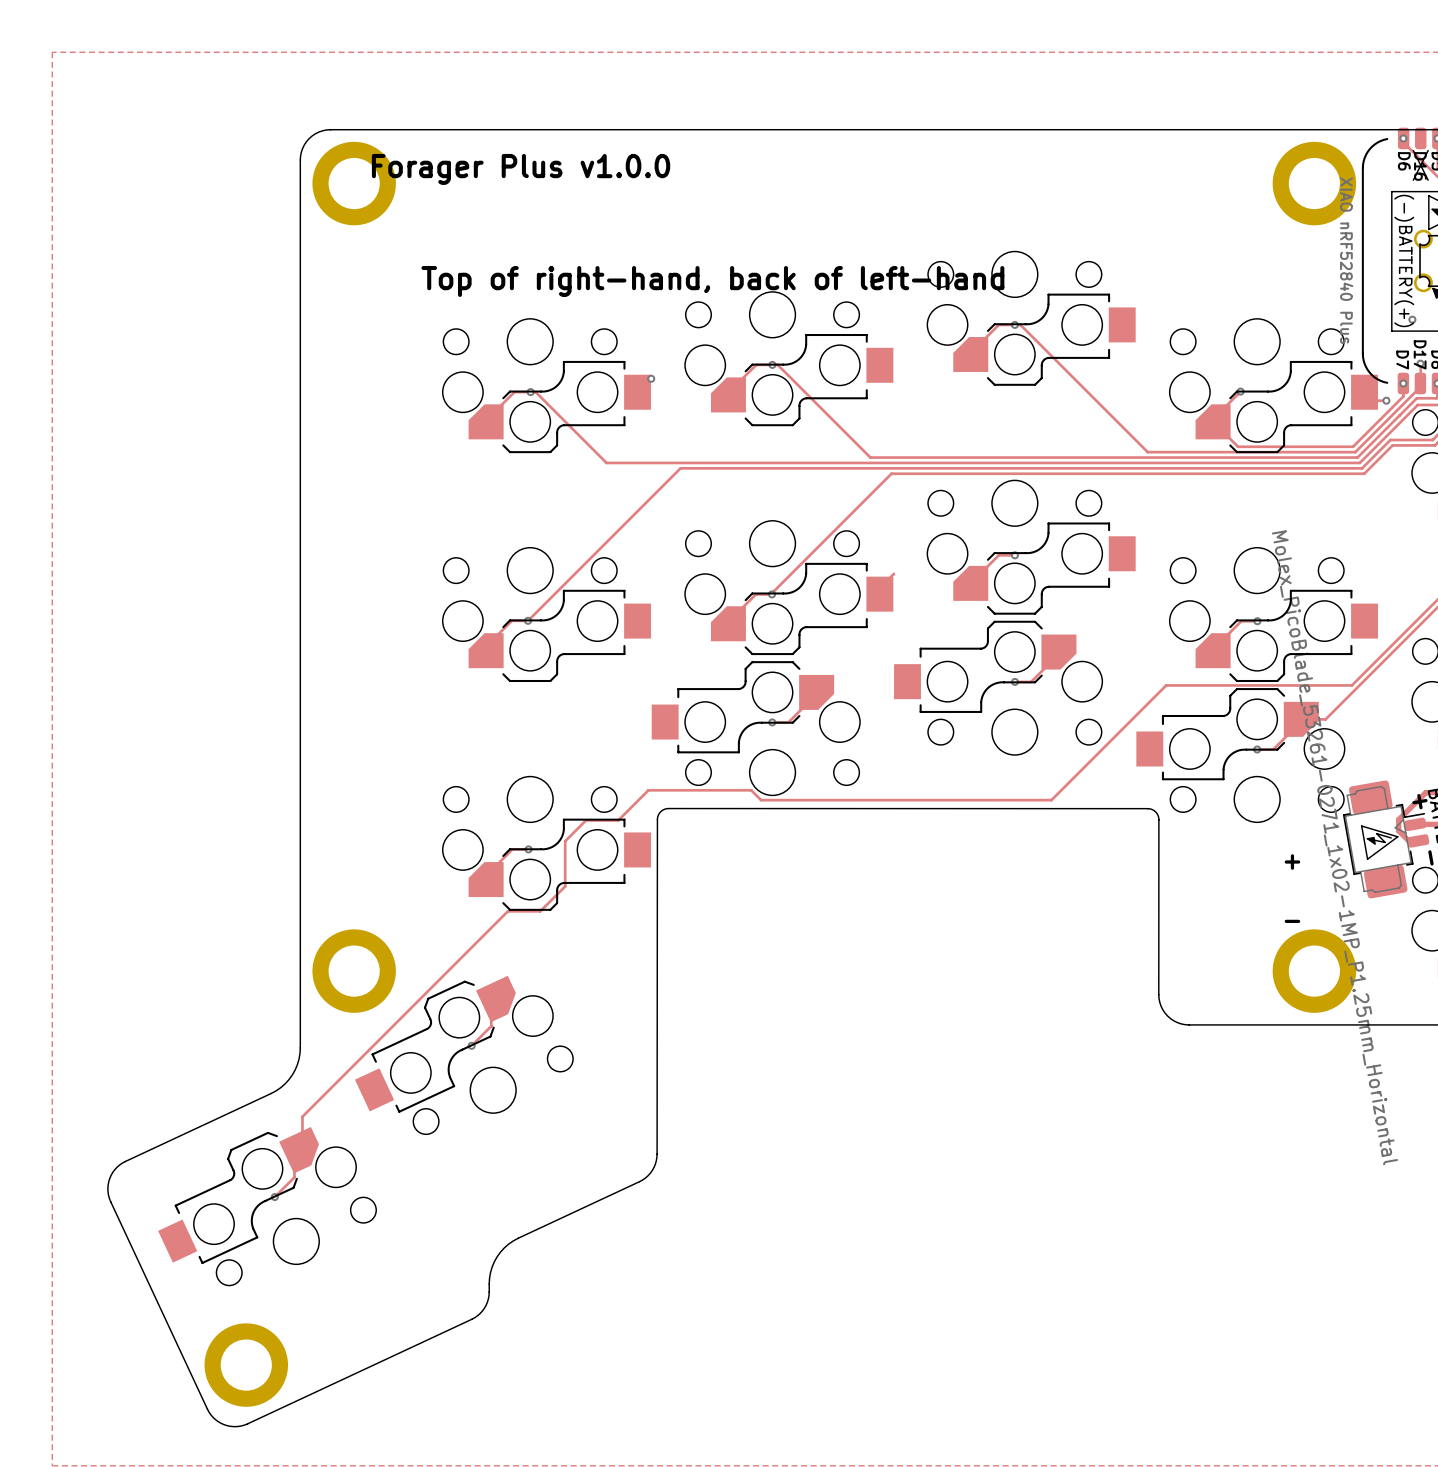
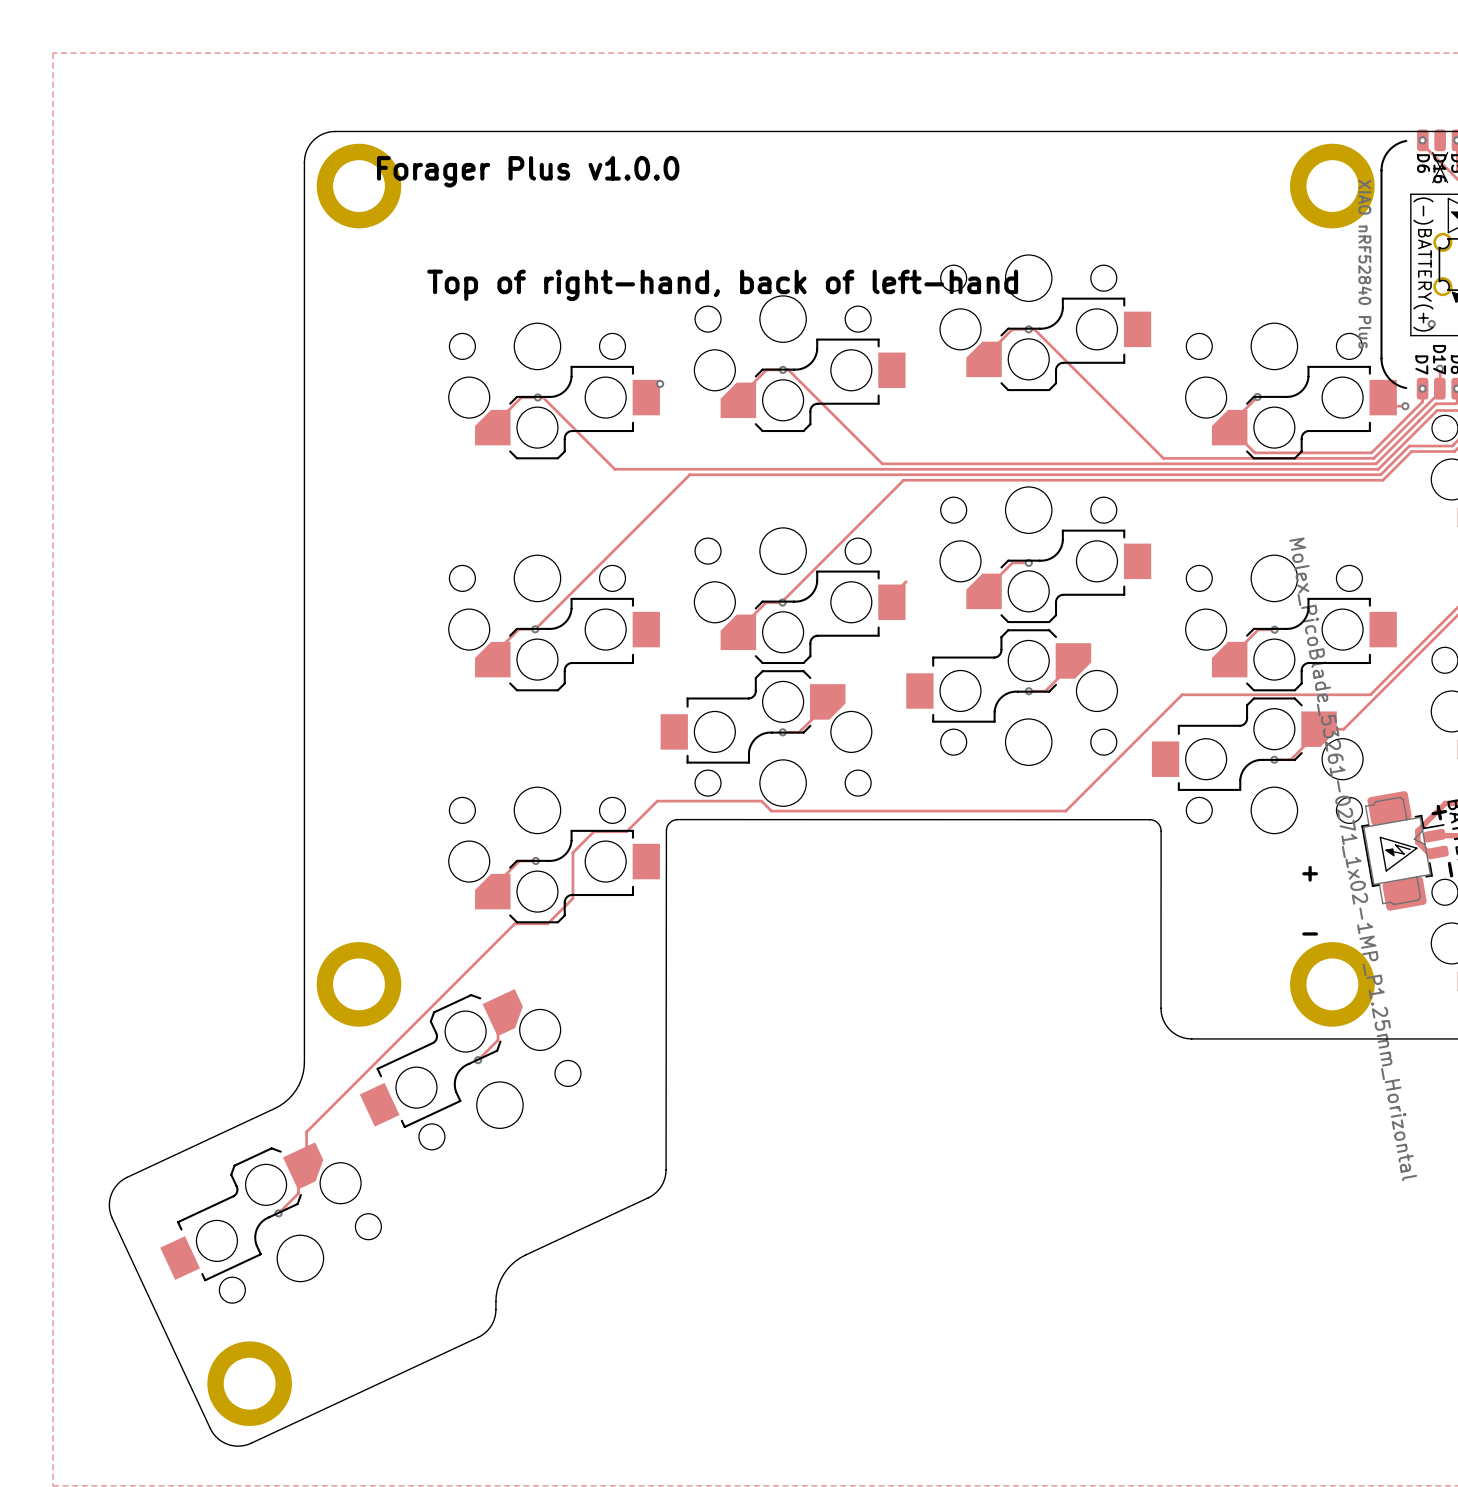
board edge: (1134, 808) (1152, 809) (1157, 814) (1158, 819) -> (1149, 819) (1157, 823) (1161, 830)
board edge: (1158, 819) (1159, 998) (1162, 1009) (1170, 1018) (1177, 1022) (1189, 1024) -> (1161, 831) (1162, 1016) (1167, 1026) (1176, 1034) (1187, 1038) (1205, 1038)

